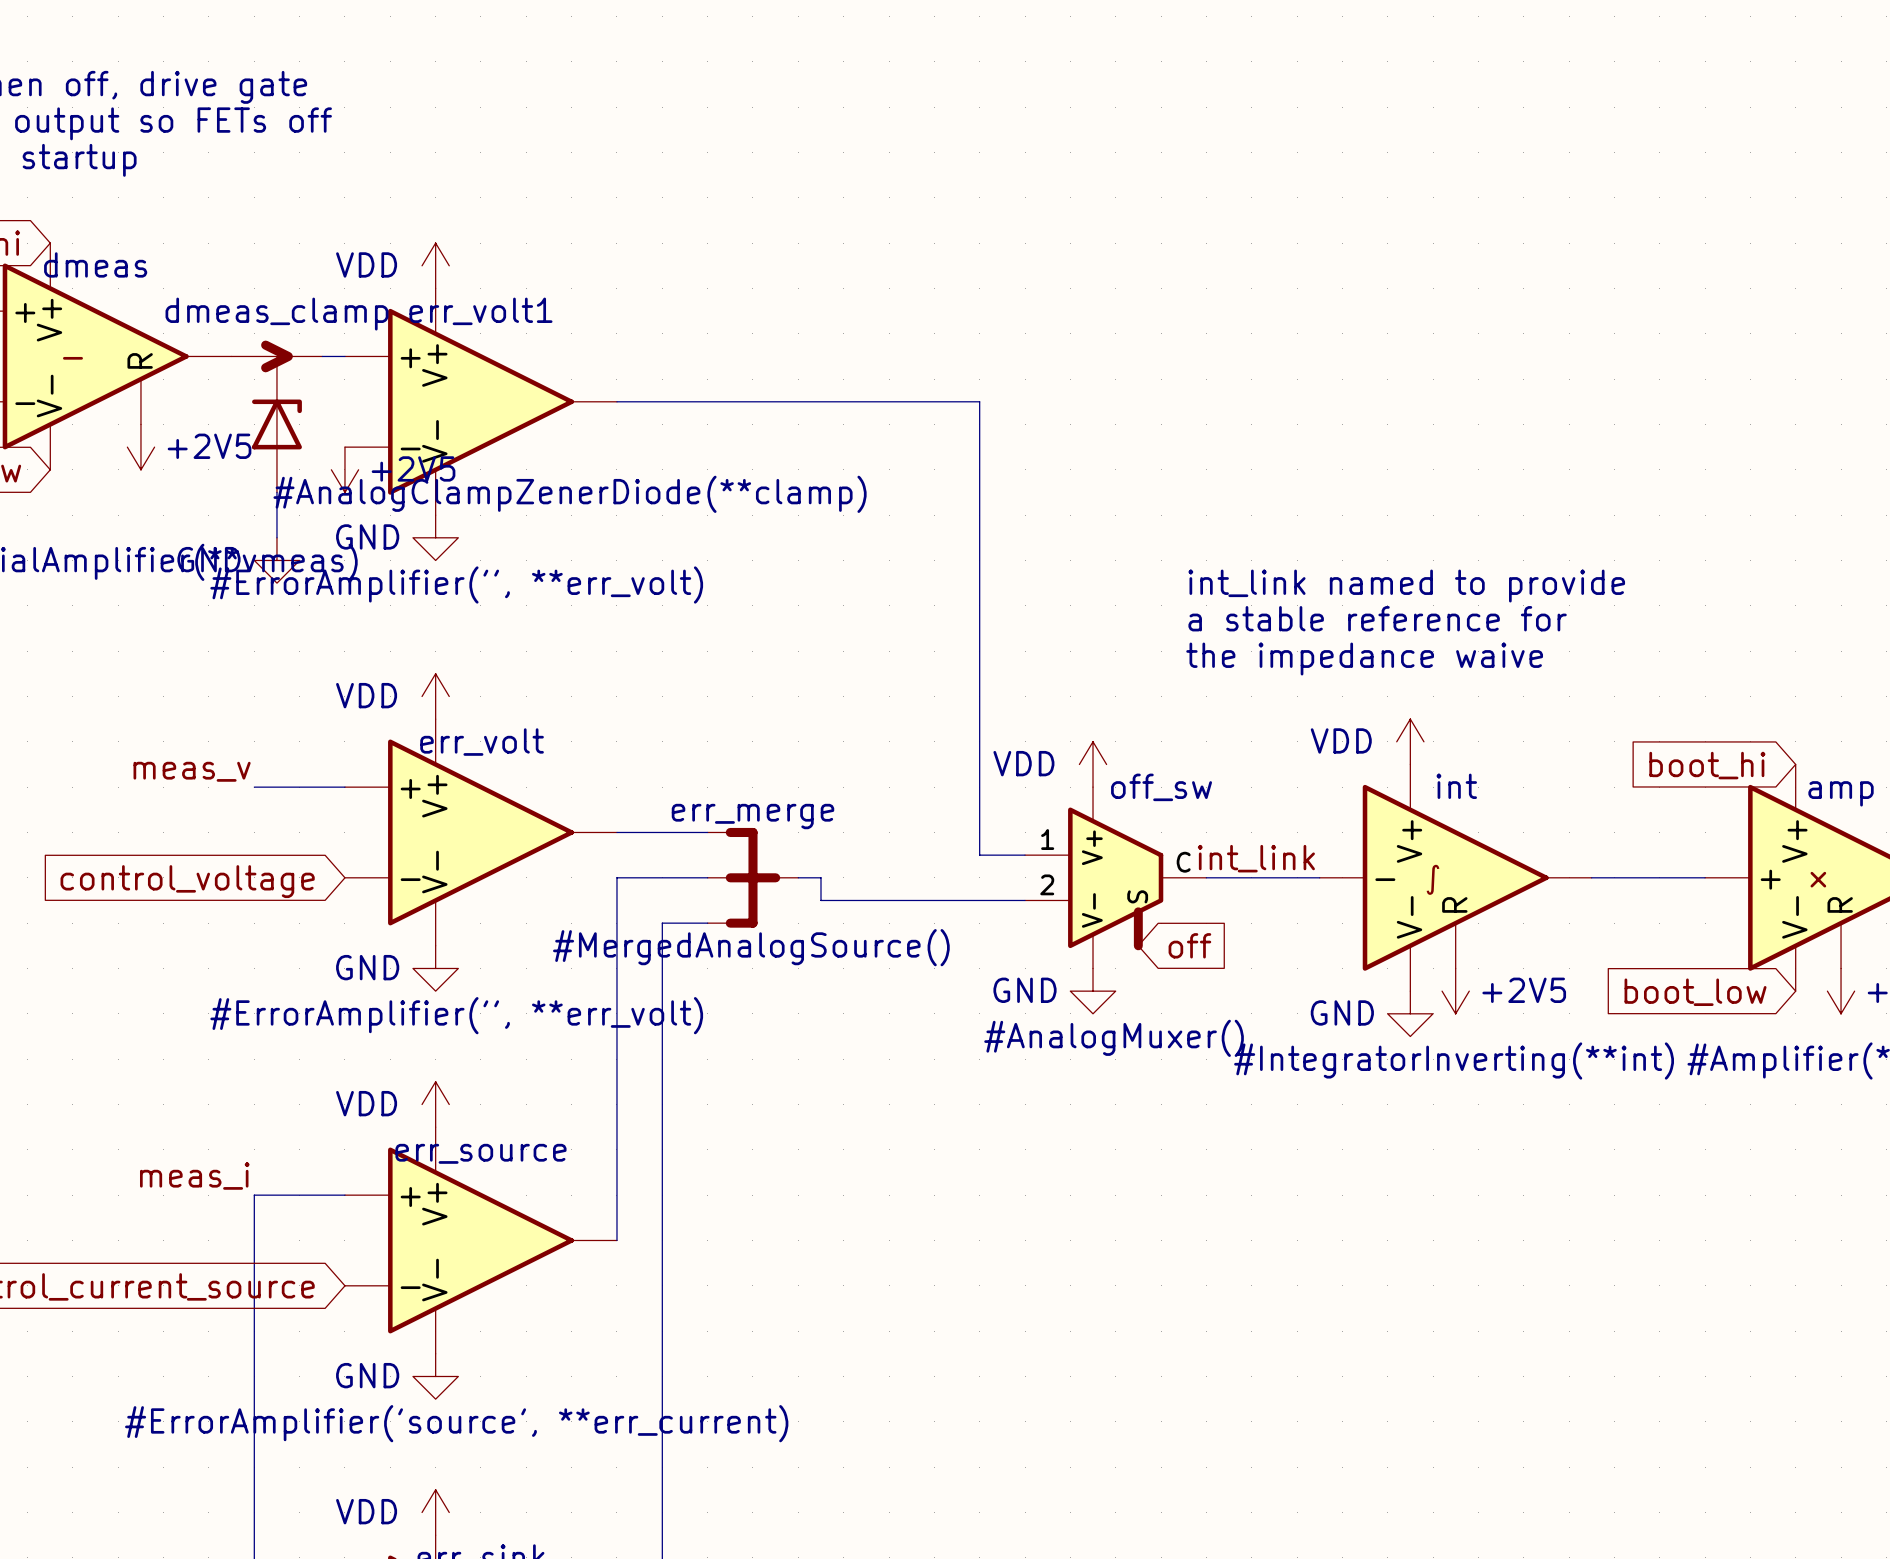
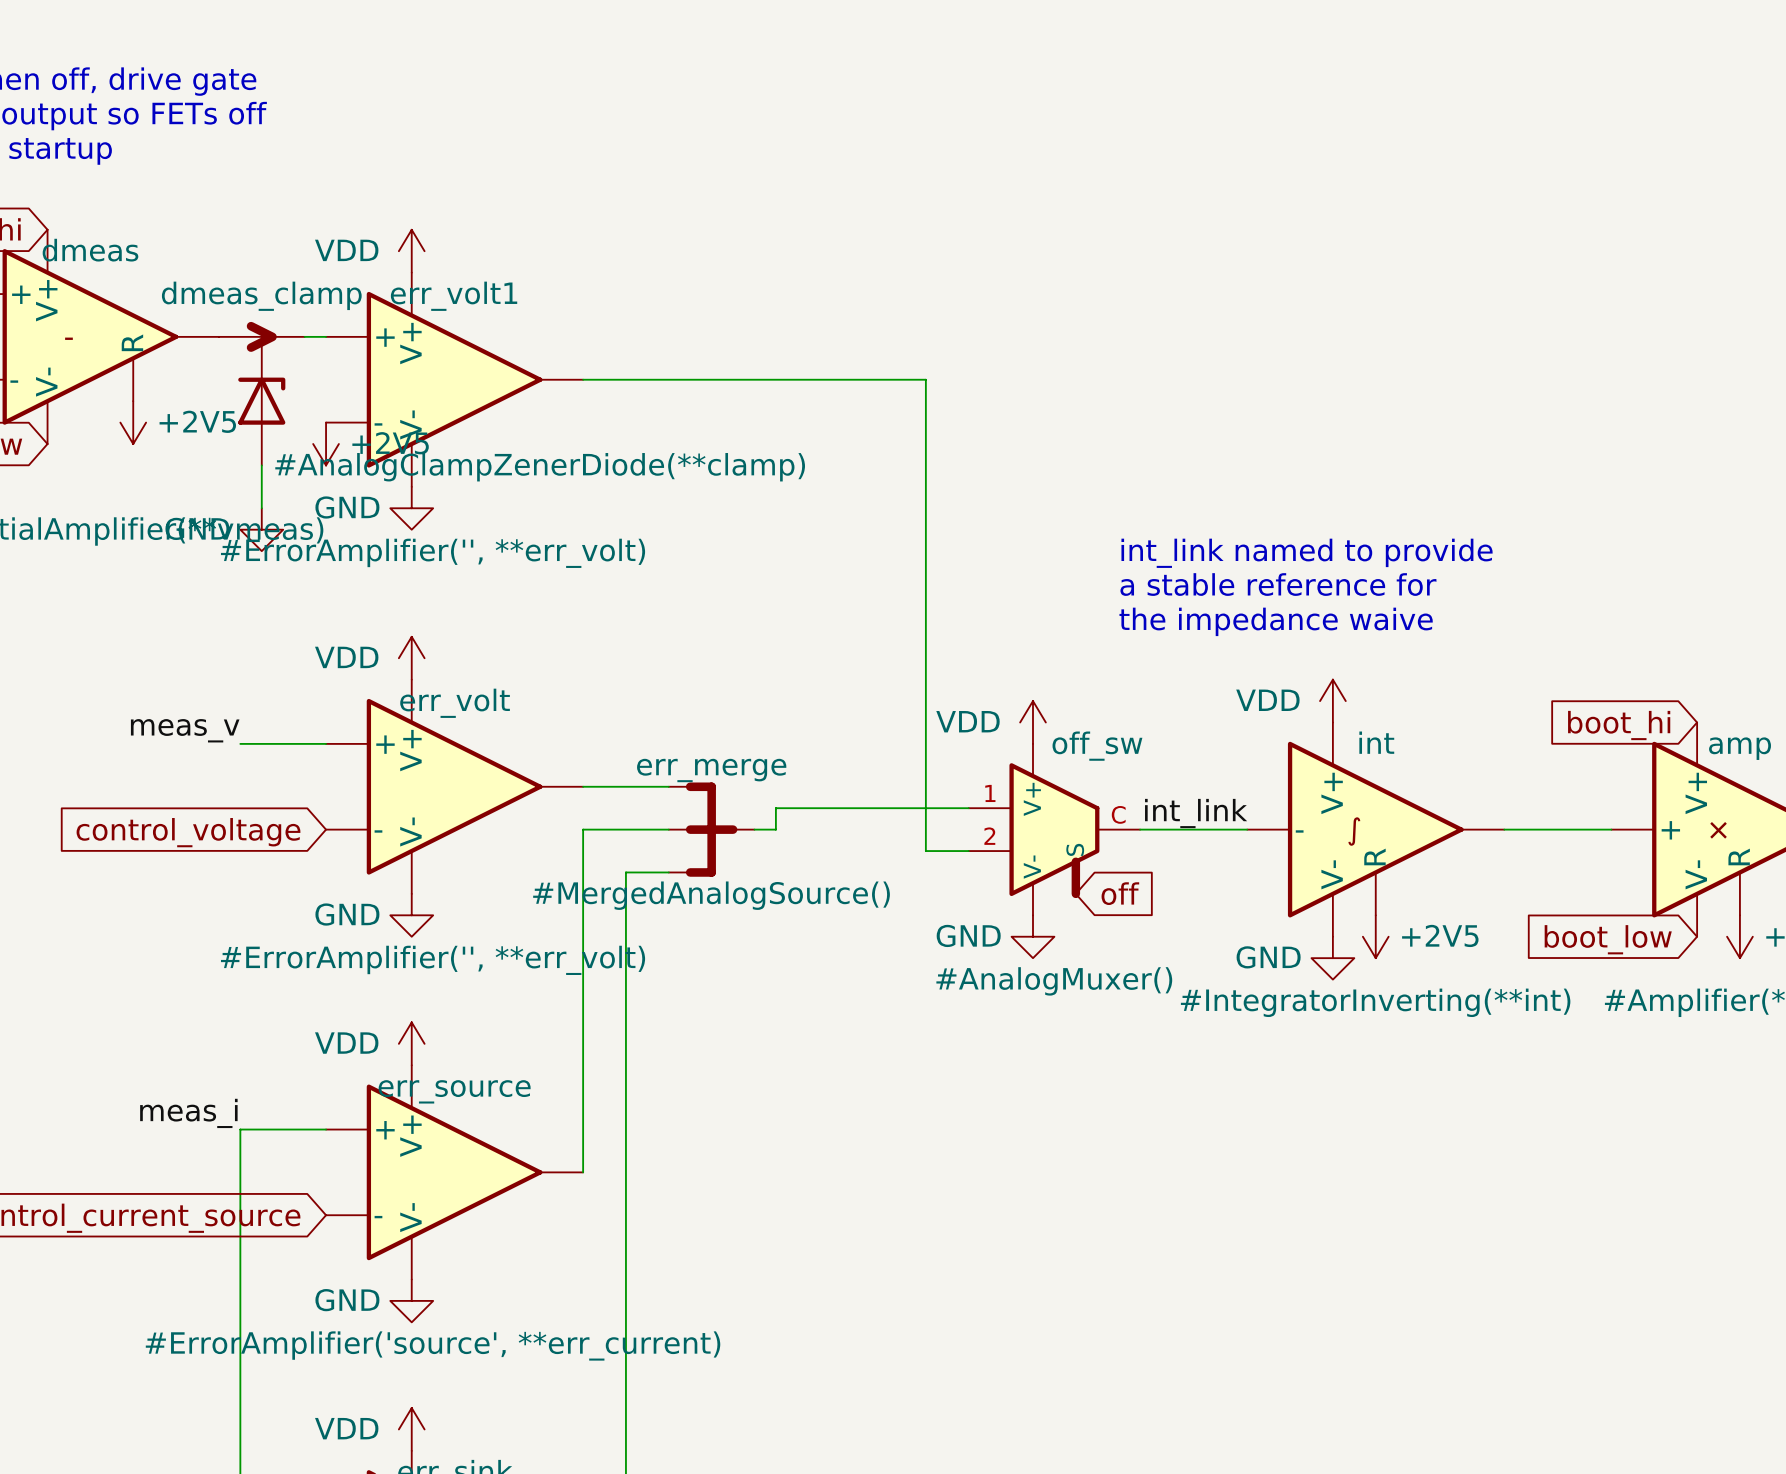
wire: (820, 877) (820, 900) (979, 900) -> (775, 829) (775, 808) (925, 808) (925, 851)

